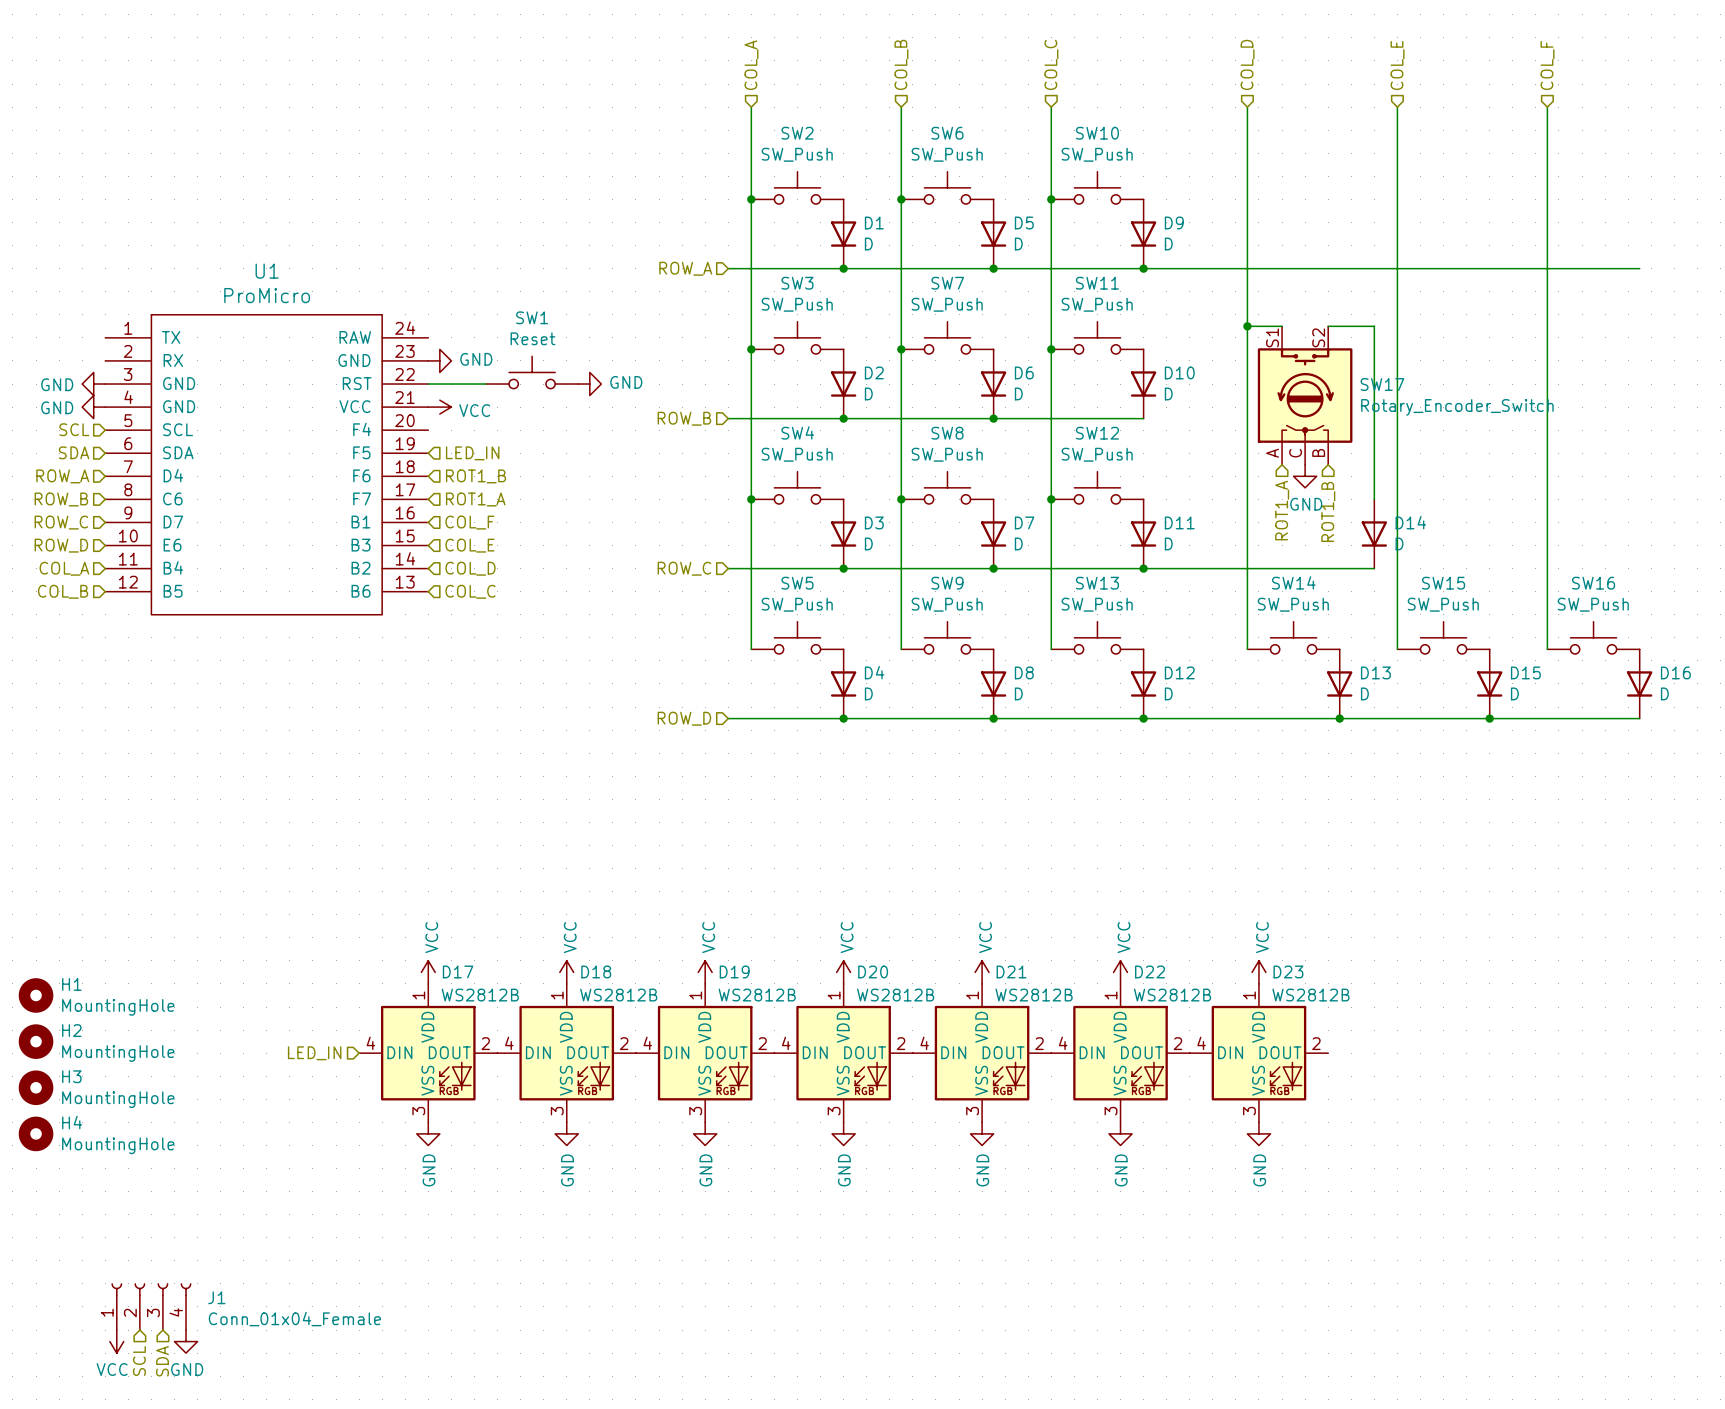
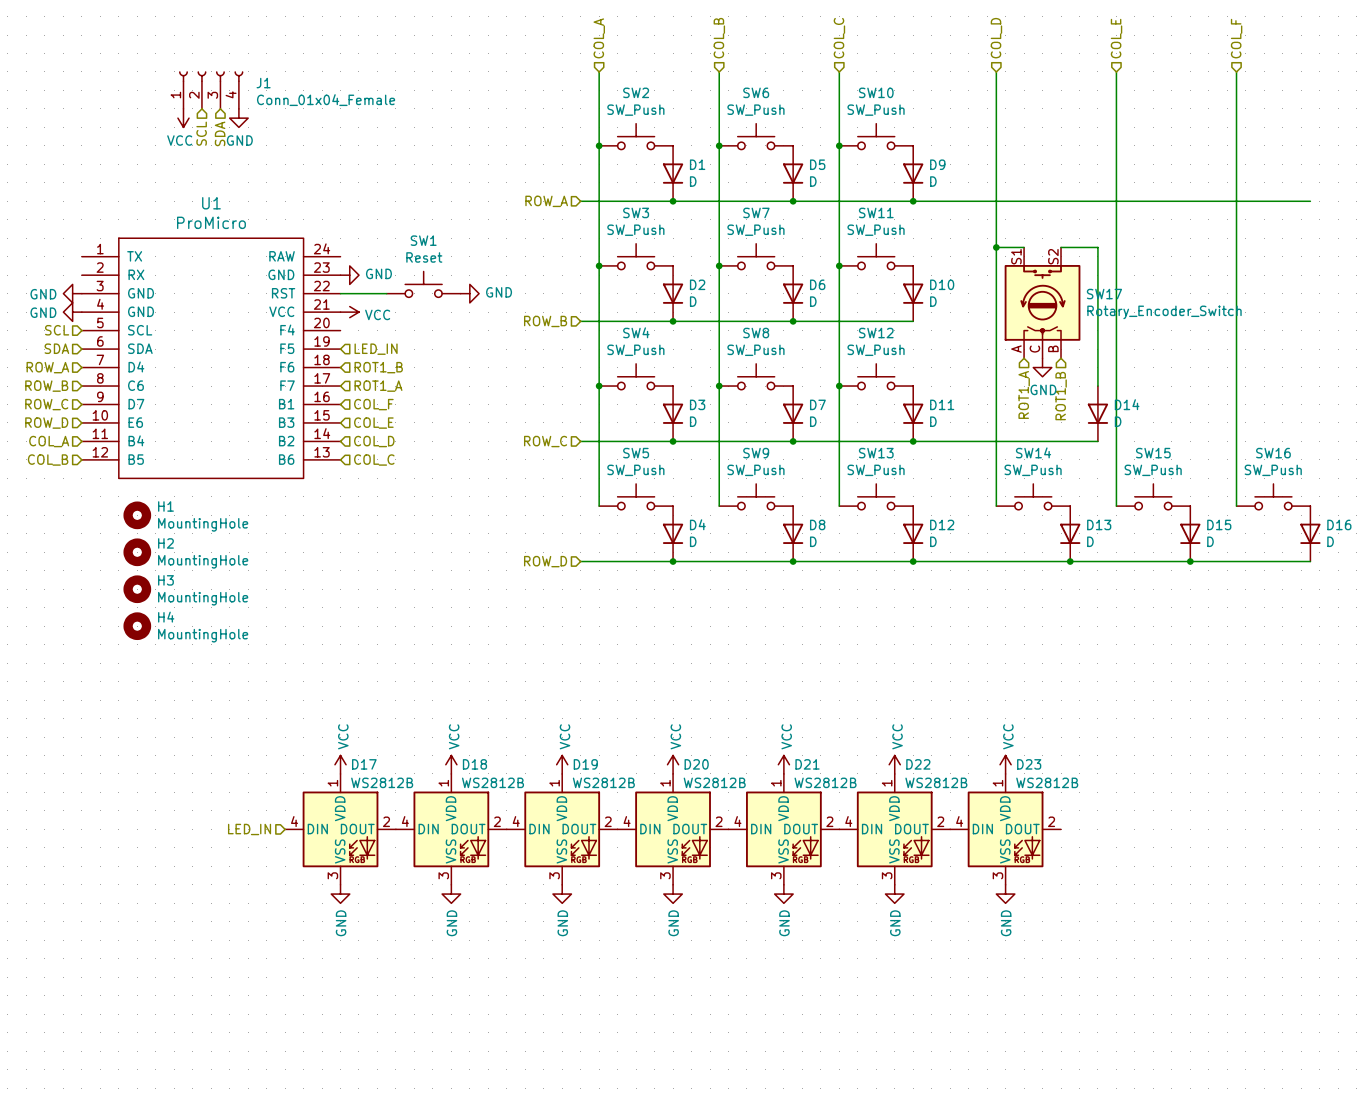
power symbol: none -> VCC (183, 118)
power symbol: none -> GND (238, 118)
hierarchical label: none -> SCL (201, 133)
hierarchical label: none -> SDA (220, 133)
H1 position: (36, 995) -> (137, 515)
H2 position: (36, 1041) -> (137, 552)
H3 position: (36, 1087) -> (137, 589)
H4 position: (36, 1133) -> (137, 626)
J1 position: (151, 1306) -> (211, 90)
power symbol: VCC (116, 1341) -> none
power symbol: GND (186, 1341) -> none
hierarchical label: SCL (139, 1360) -> none
hierarchical label: SDA (162, 1361) -> none

